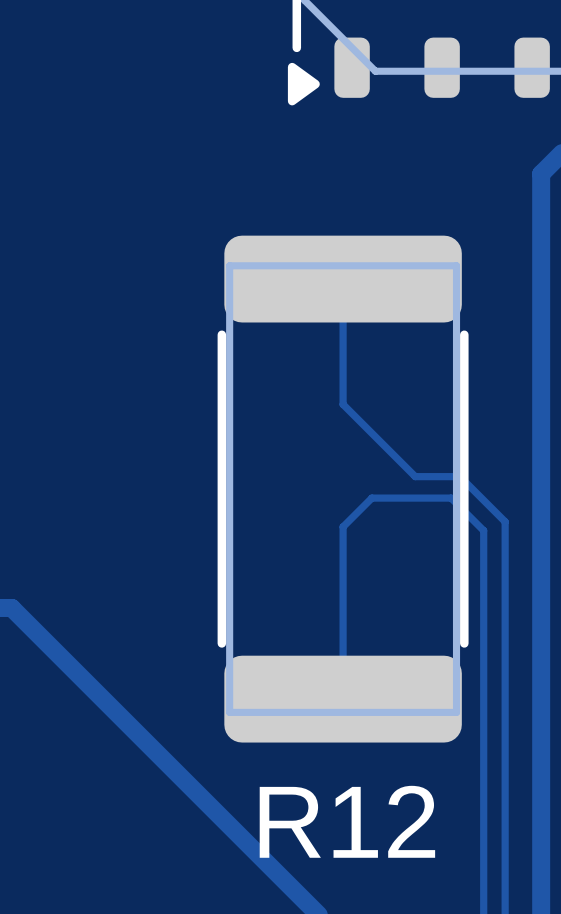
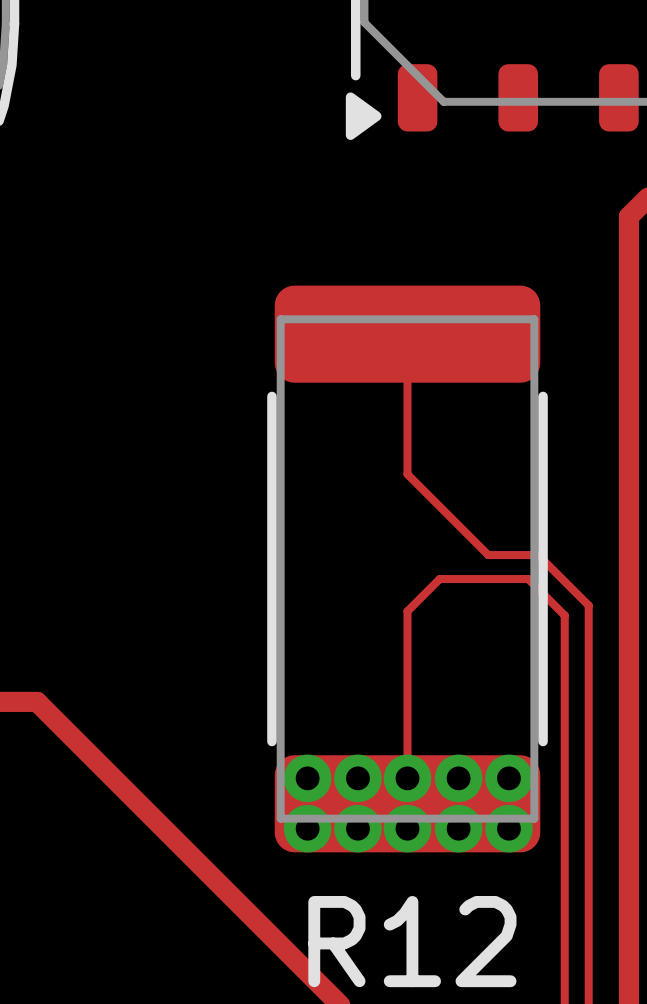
via: none -> (307, 778)
via: none -> (357, 778)
via: none -> (407, 778)
via: none -> (458, 778)
via: none -> (508, 778)
via: none -> (307, 828)
via: none -> (357, 828)
via: none -> (407, 828)
via: none -> (458, 828)
via: none -> (508, 828)

